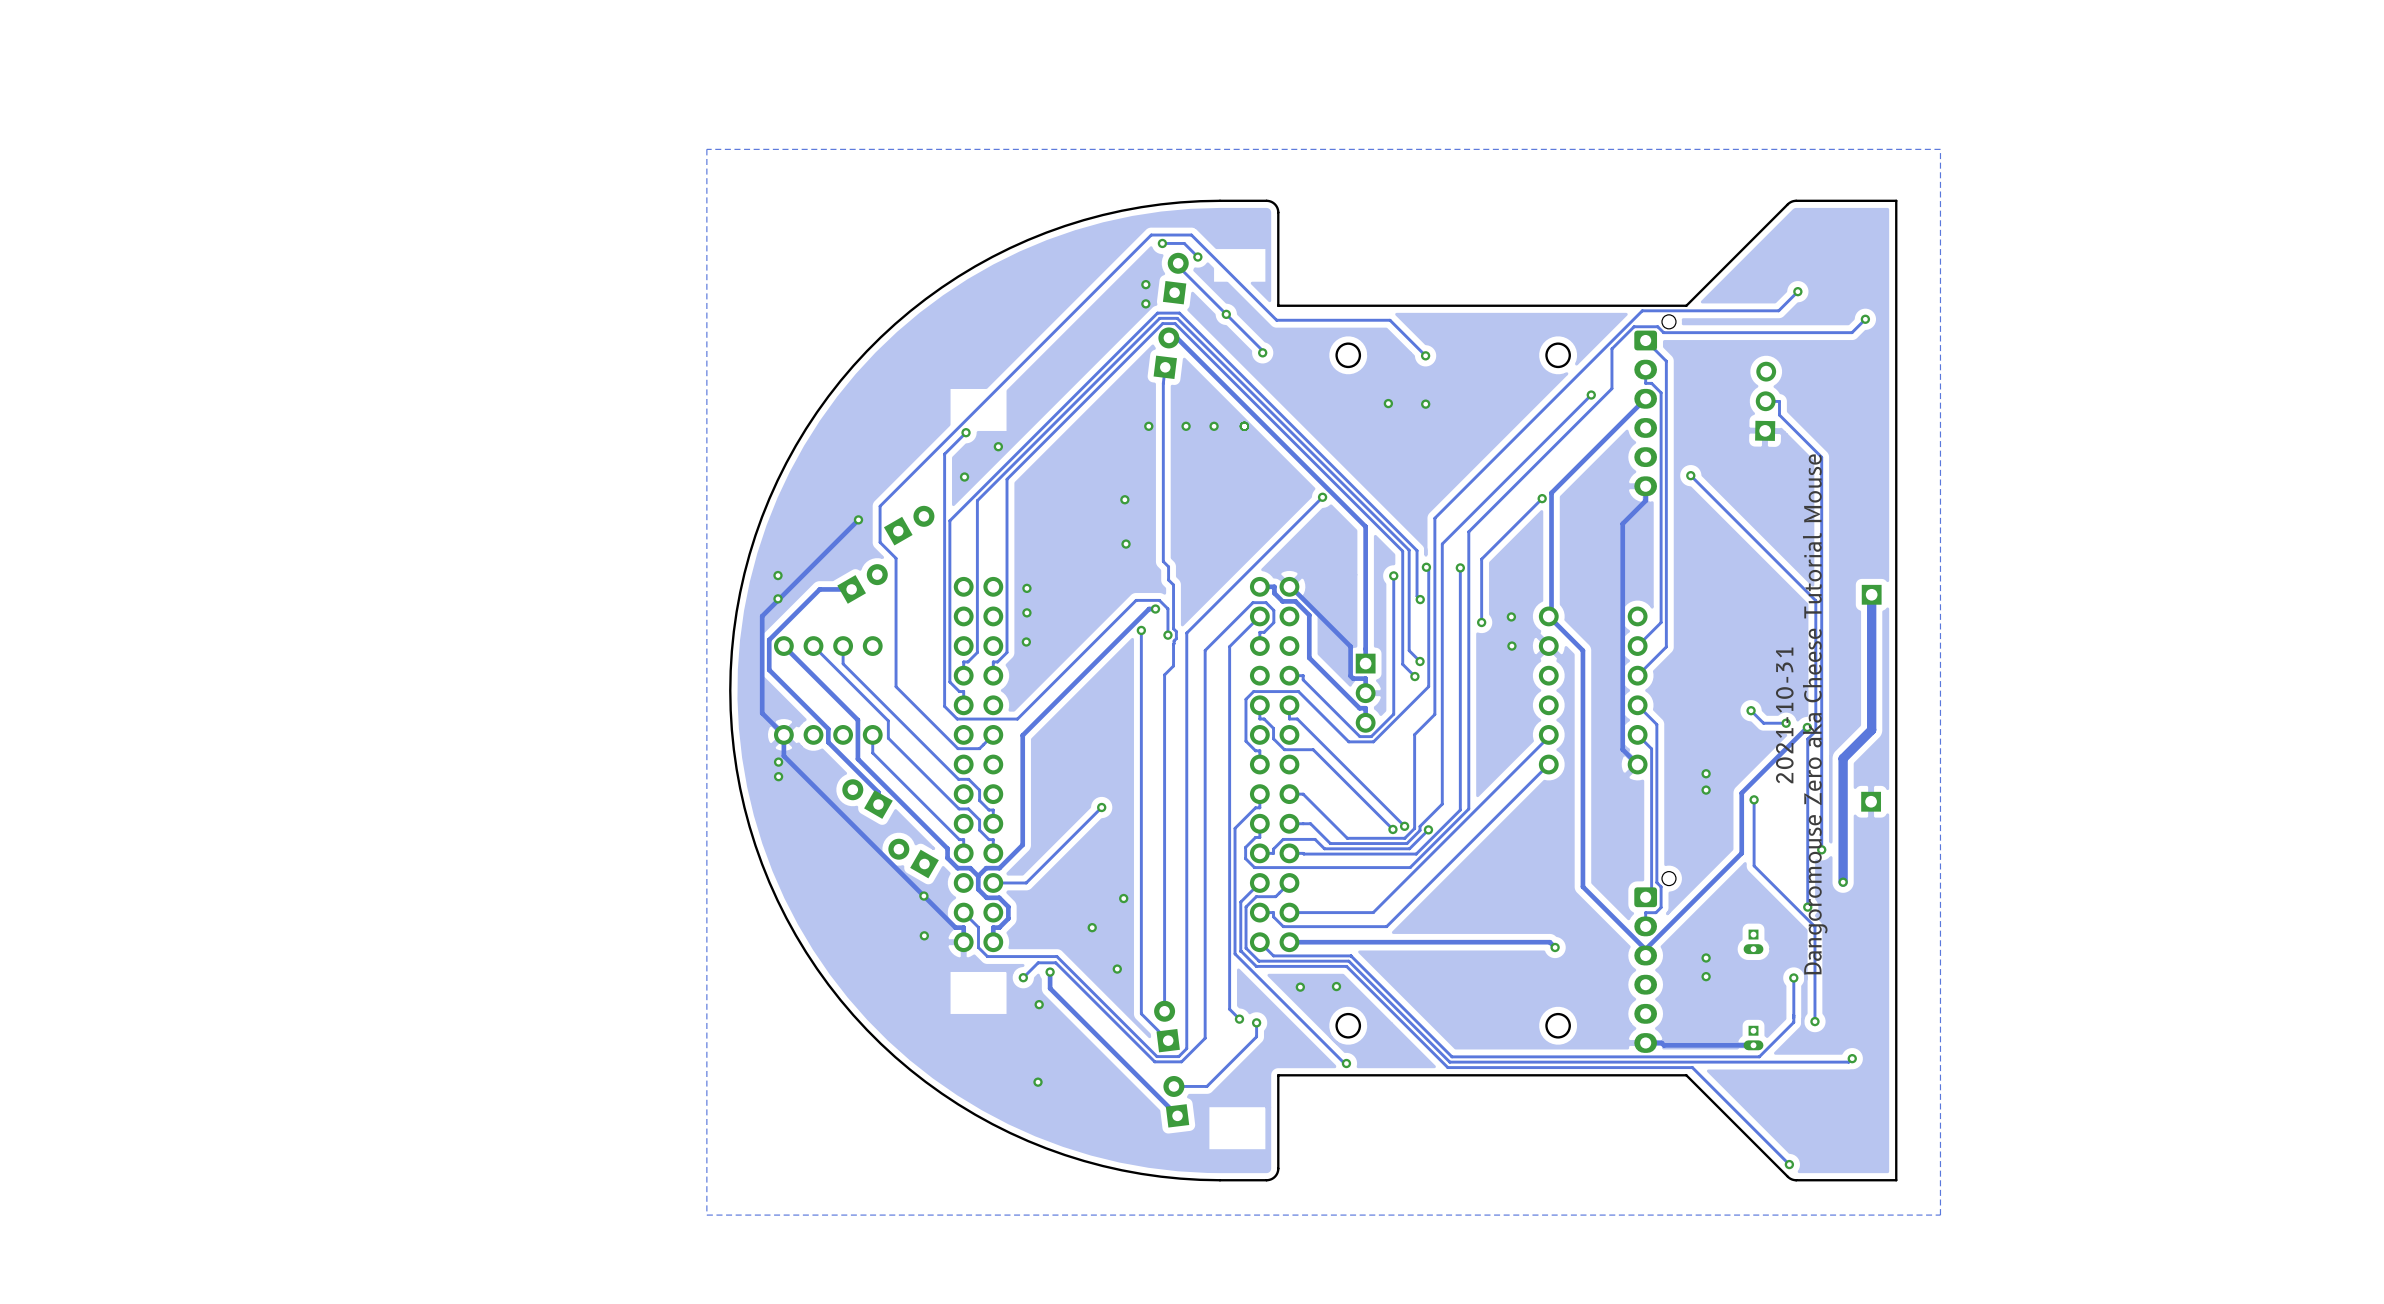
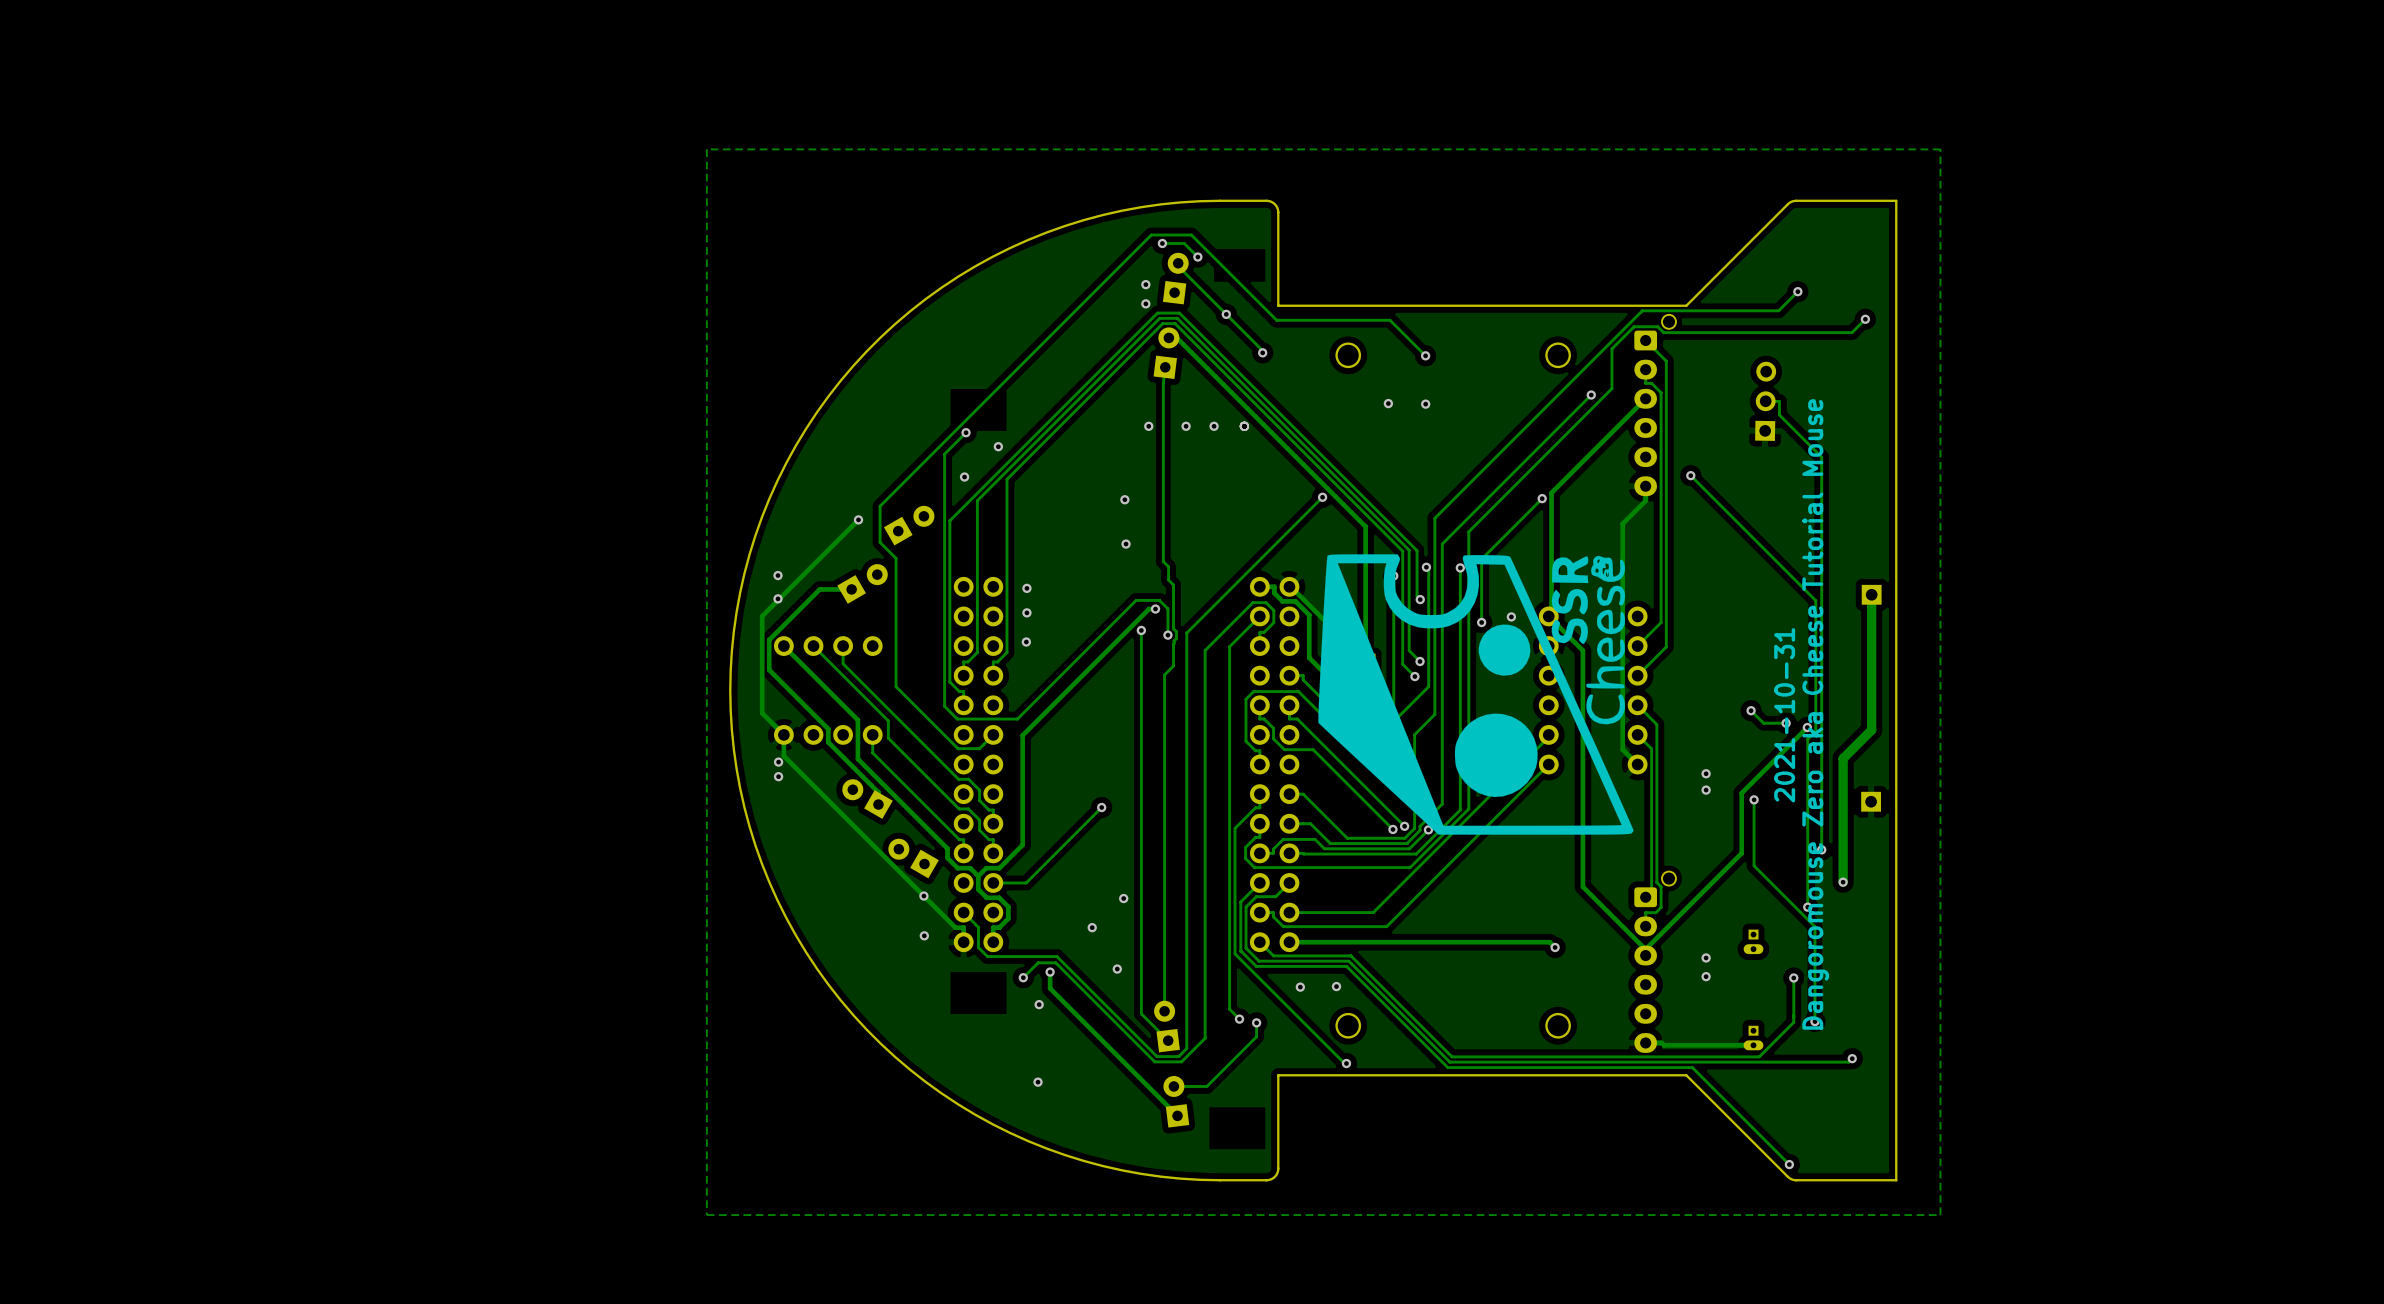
drawing: none -> [1318, 554, 1634, 835]

